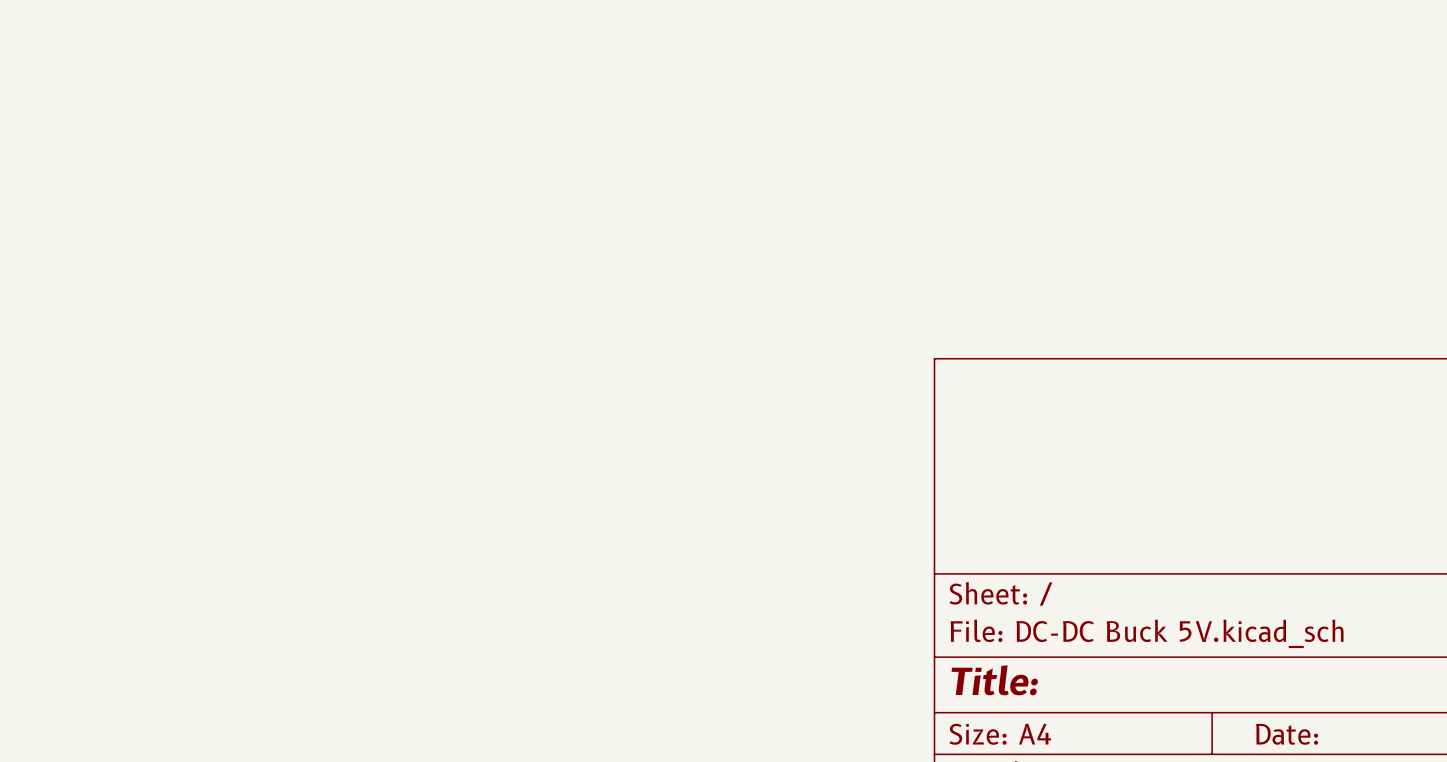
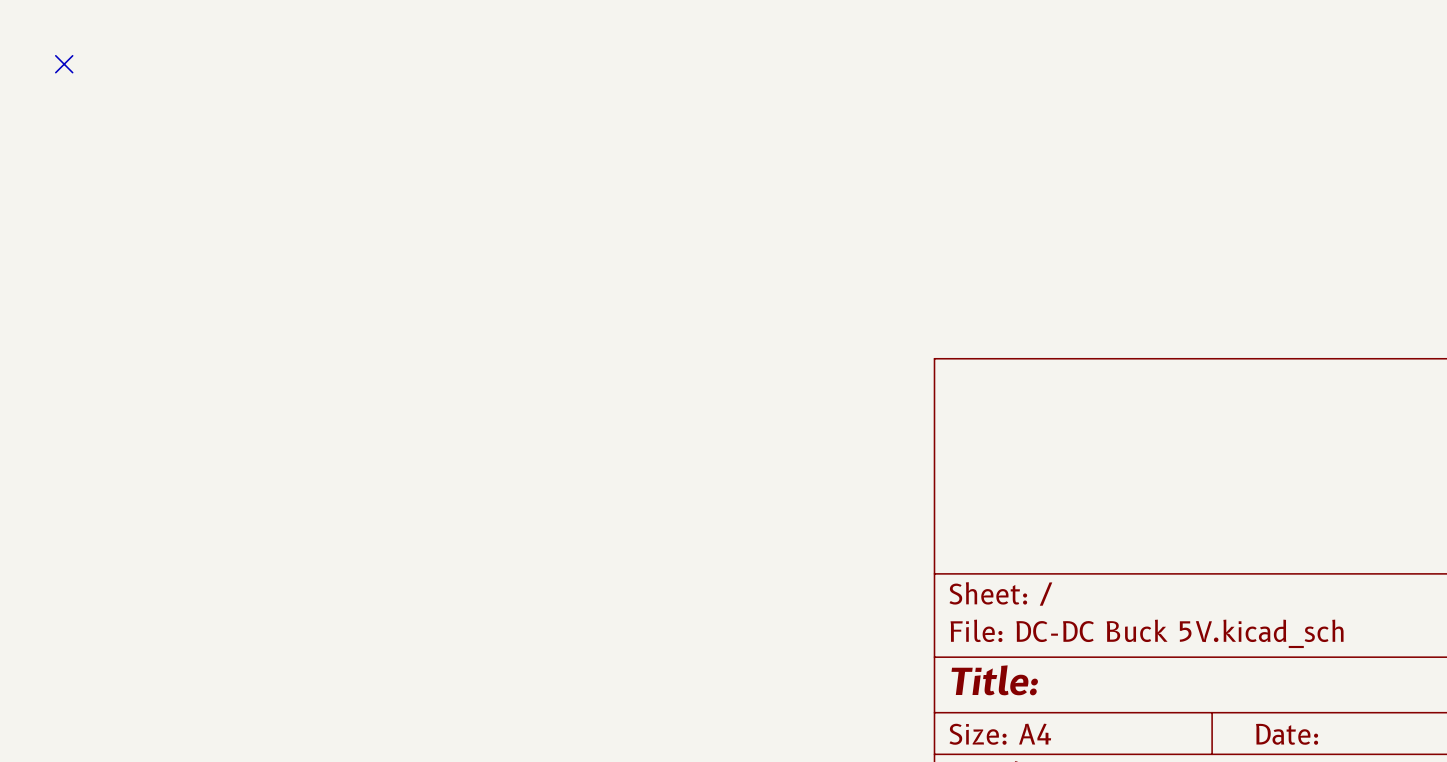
no-connect mark: none -> (64, 64)

